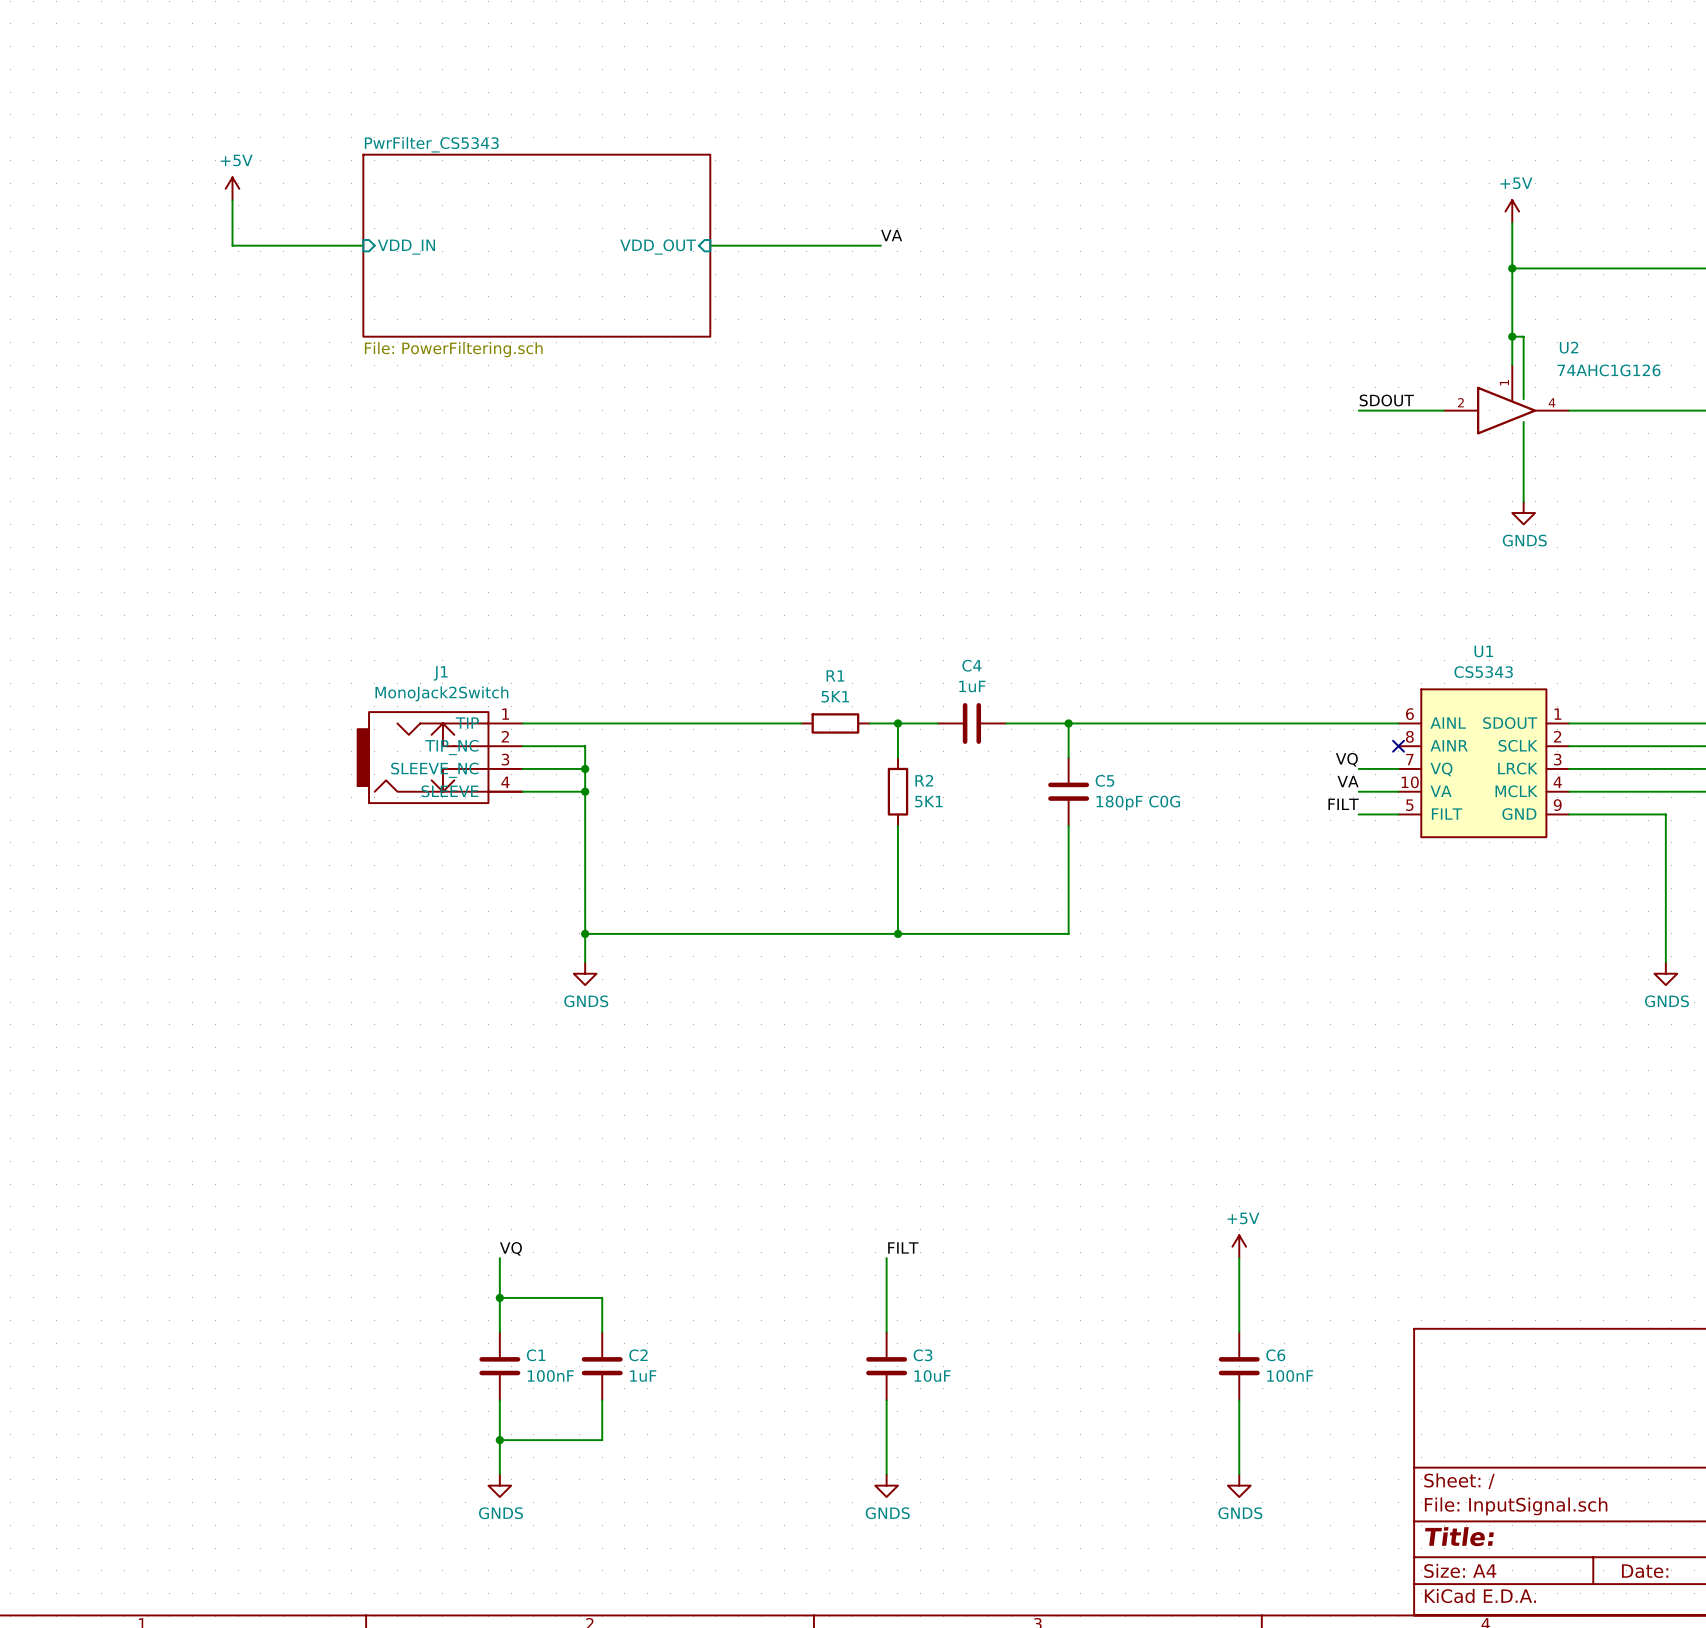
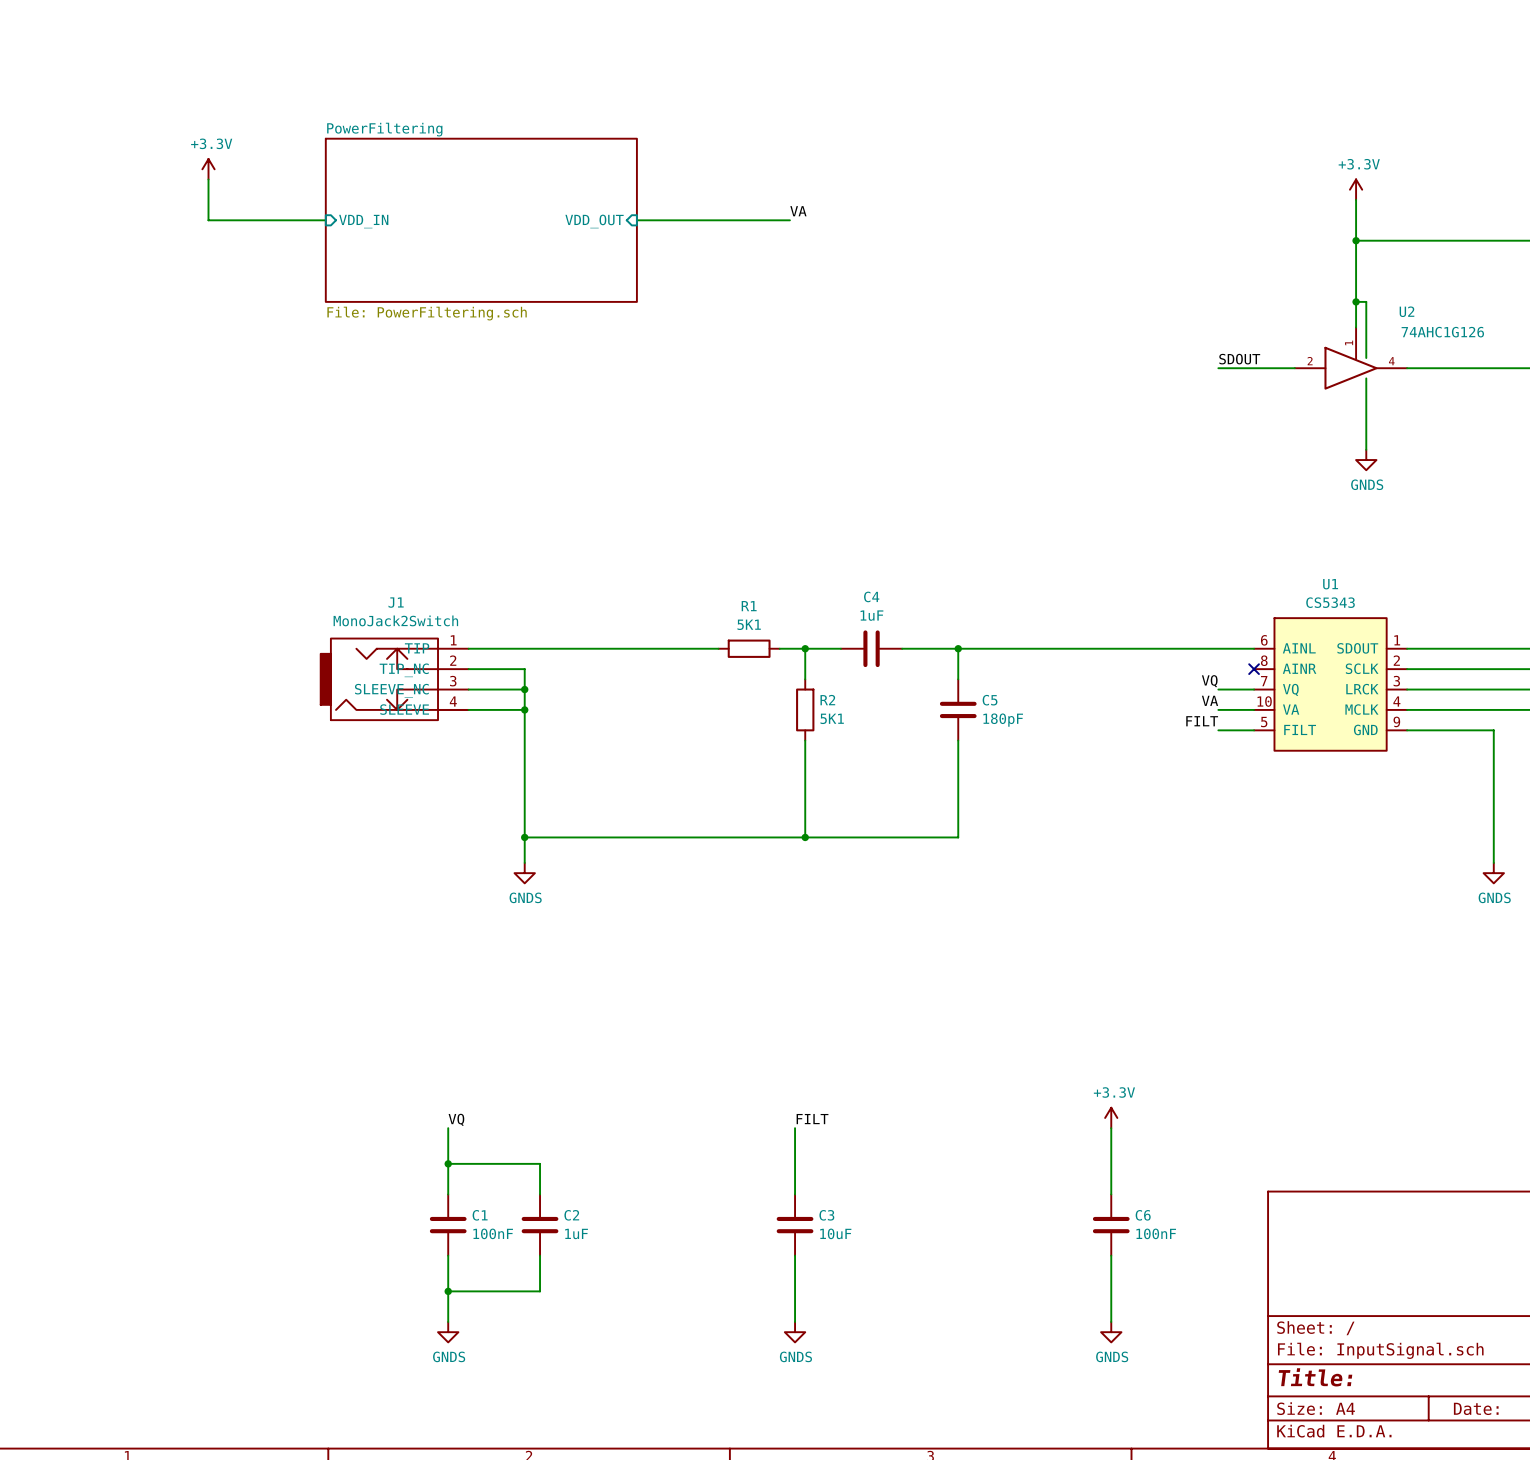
sheet PwrFilter_CS5343 name: PwrFilter_CS5343 (431, 144) -> PowerFiltering (384, 129)
power symbol: +5V (232, 188) -> +3.3V (208, 169)
power symbol: +5V (1512, 211) -> +3.3V (1356, 189)
C5 value: 180pF C0G (1138, 803) -> 180pF (1003, 720)
power symbol: +5V (1239, 1246) -> +3.3V (1111, 1117)

